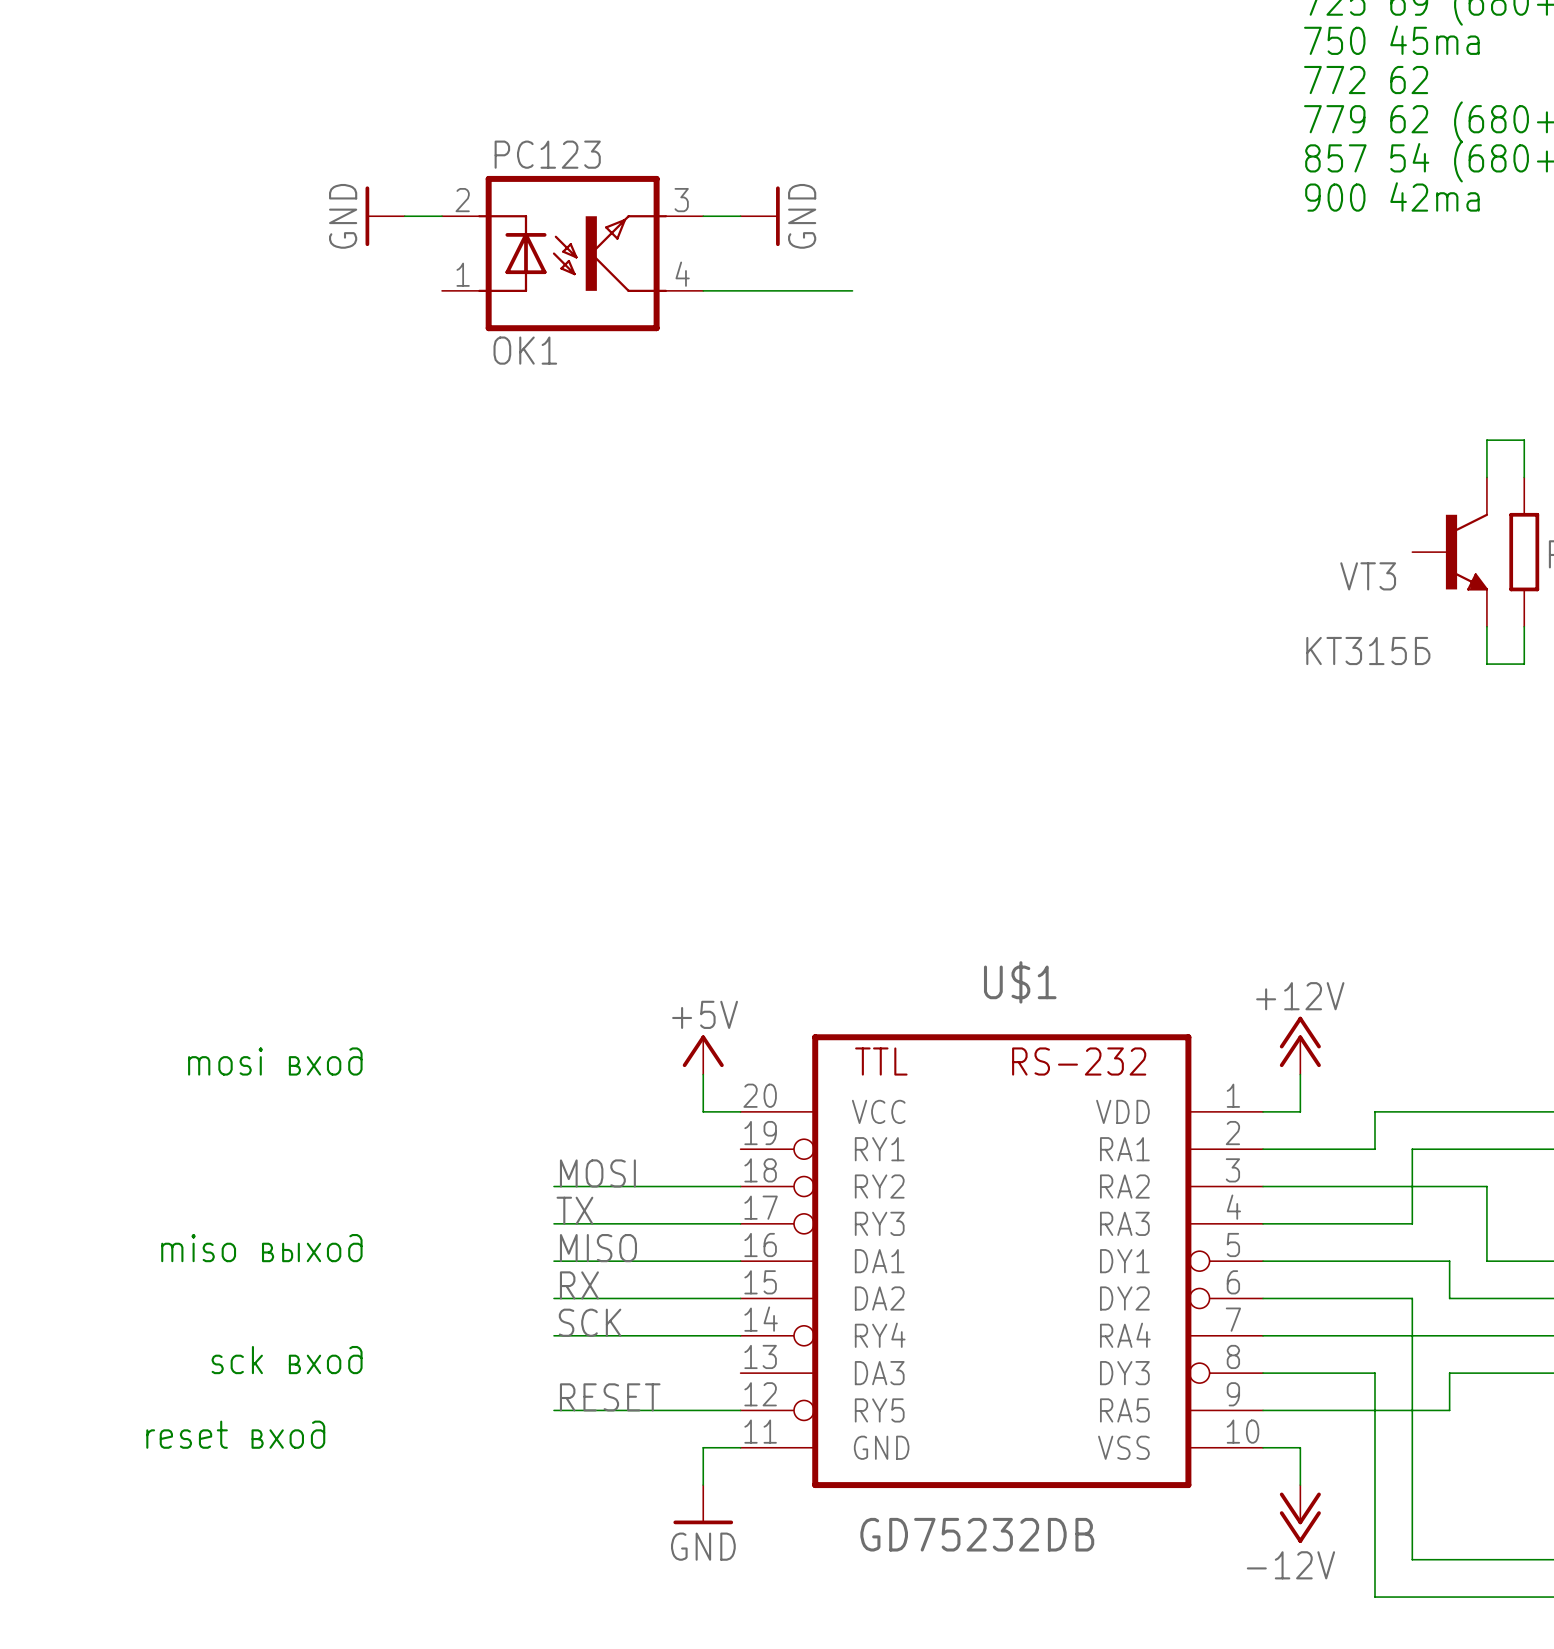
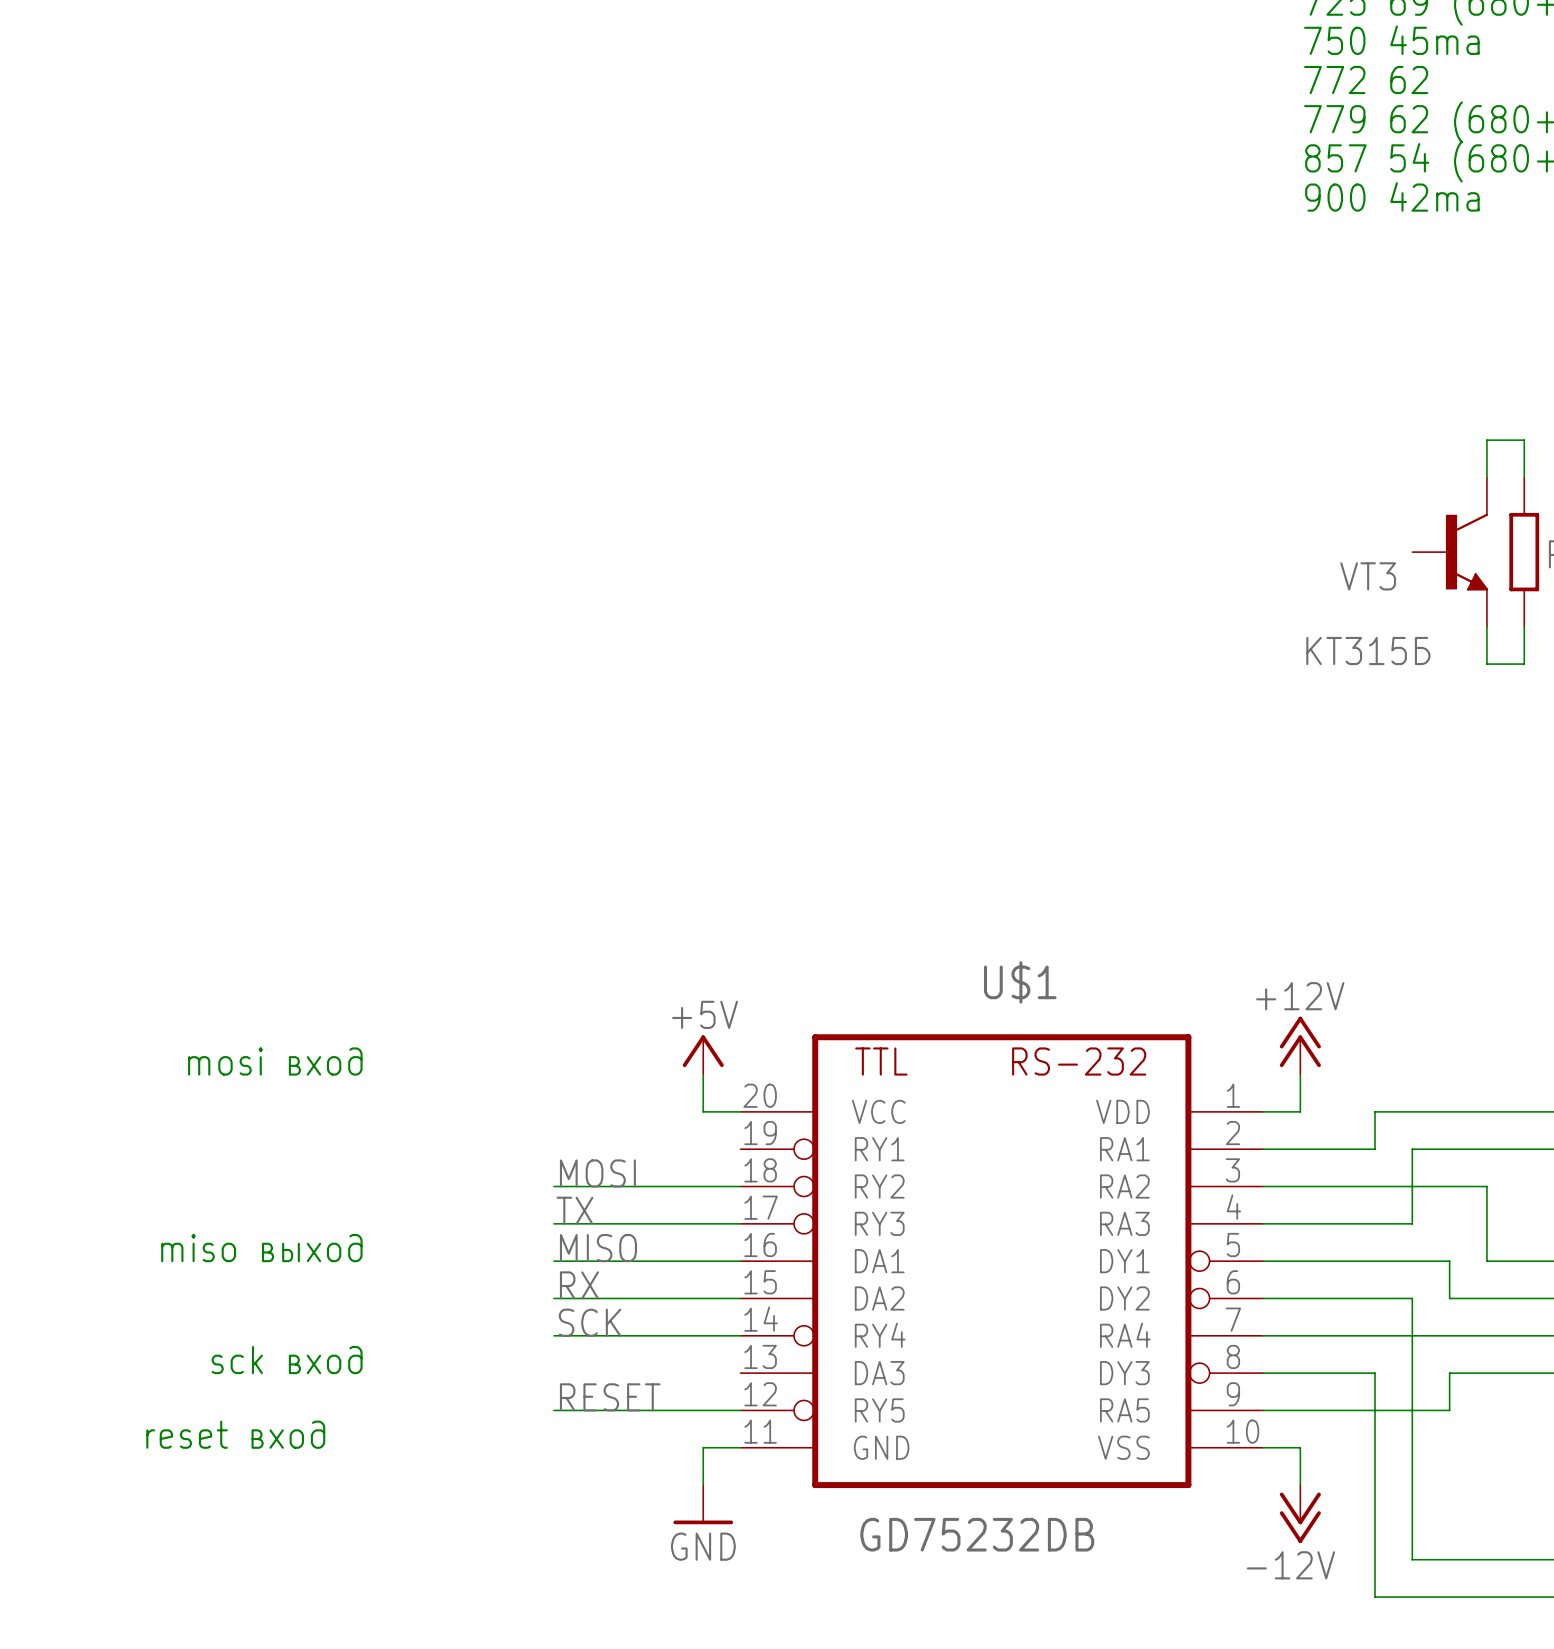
power symbol: GND (385, 216) -> none
wire: (404, 216) (442, 216) -> none
wire: (703, 216) (740, 216) -> none
power symbol: GND (760, 216) -> none
OK1: PC123 (572, 253) -> none
wire: (703, 290) (852, 290) -> none

